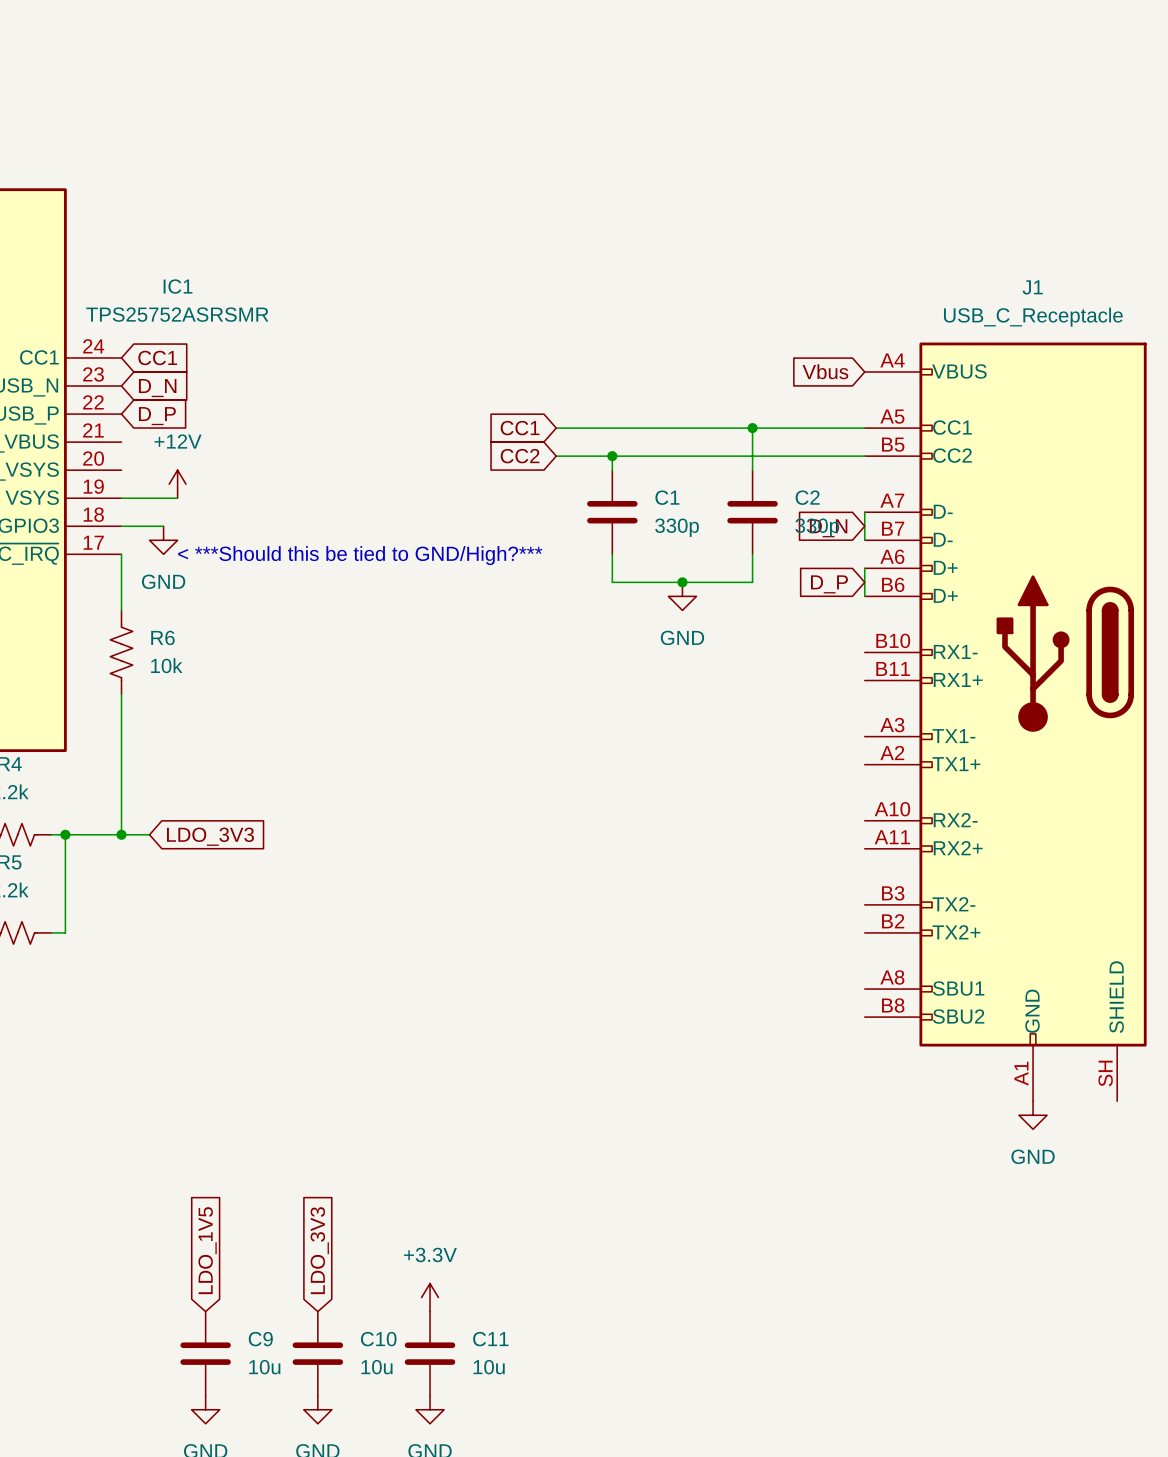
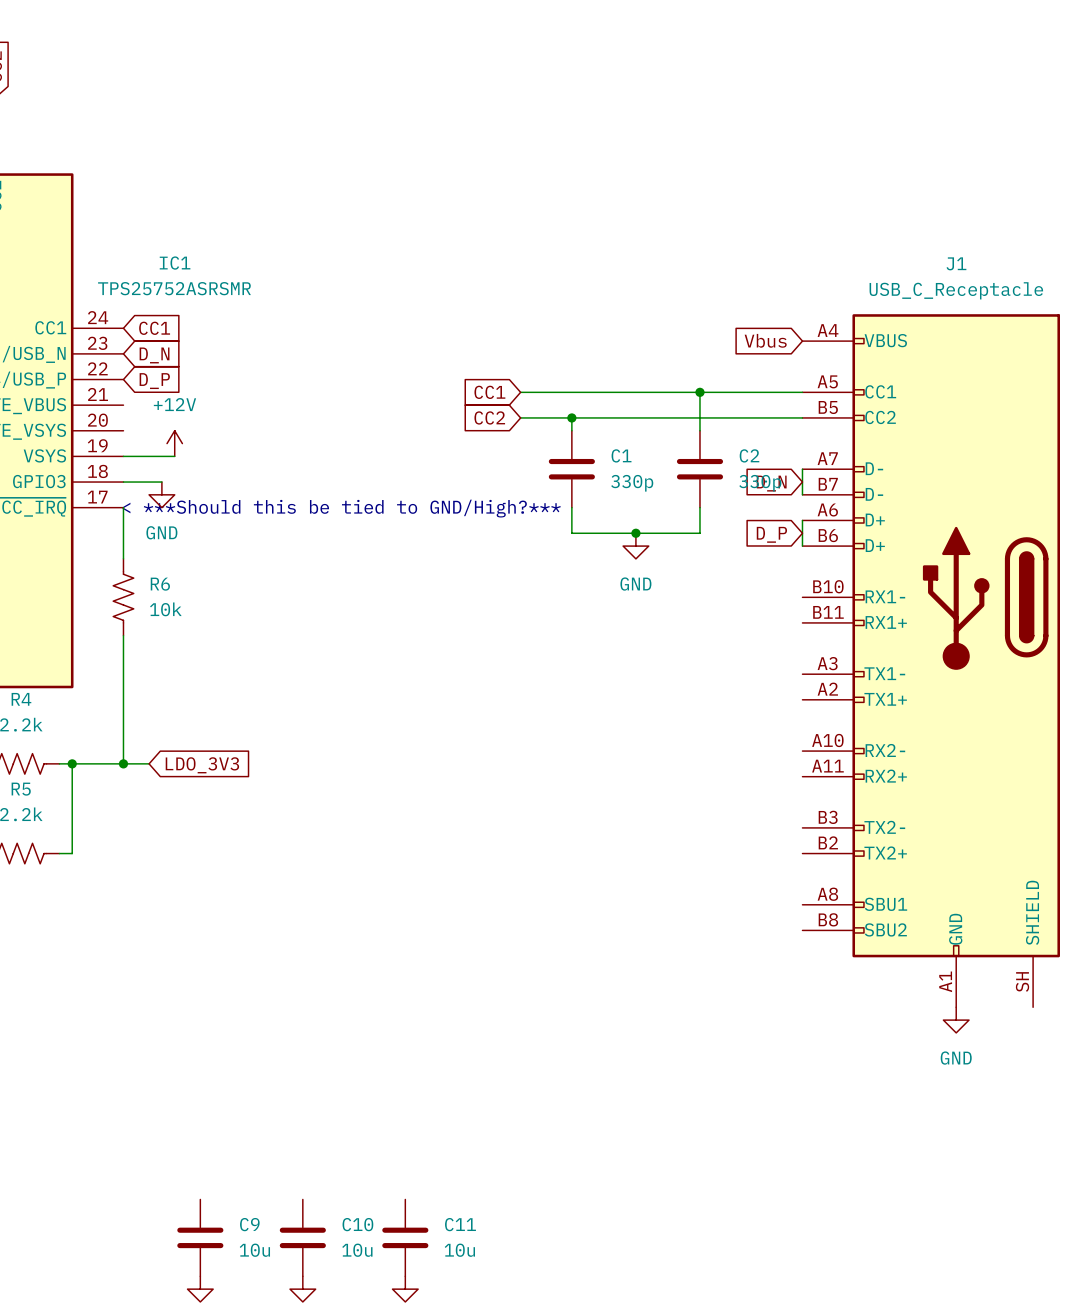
global label: LDO_1V5 (207, 1250) -> none
global label: LDO_3V3 (319, 1250) -> none
power symbol: +3.3V (430, 1297) -> none

